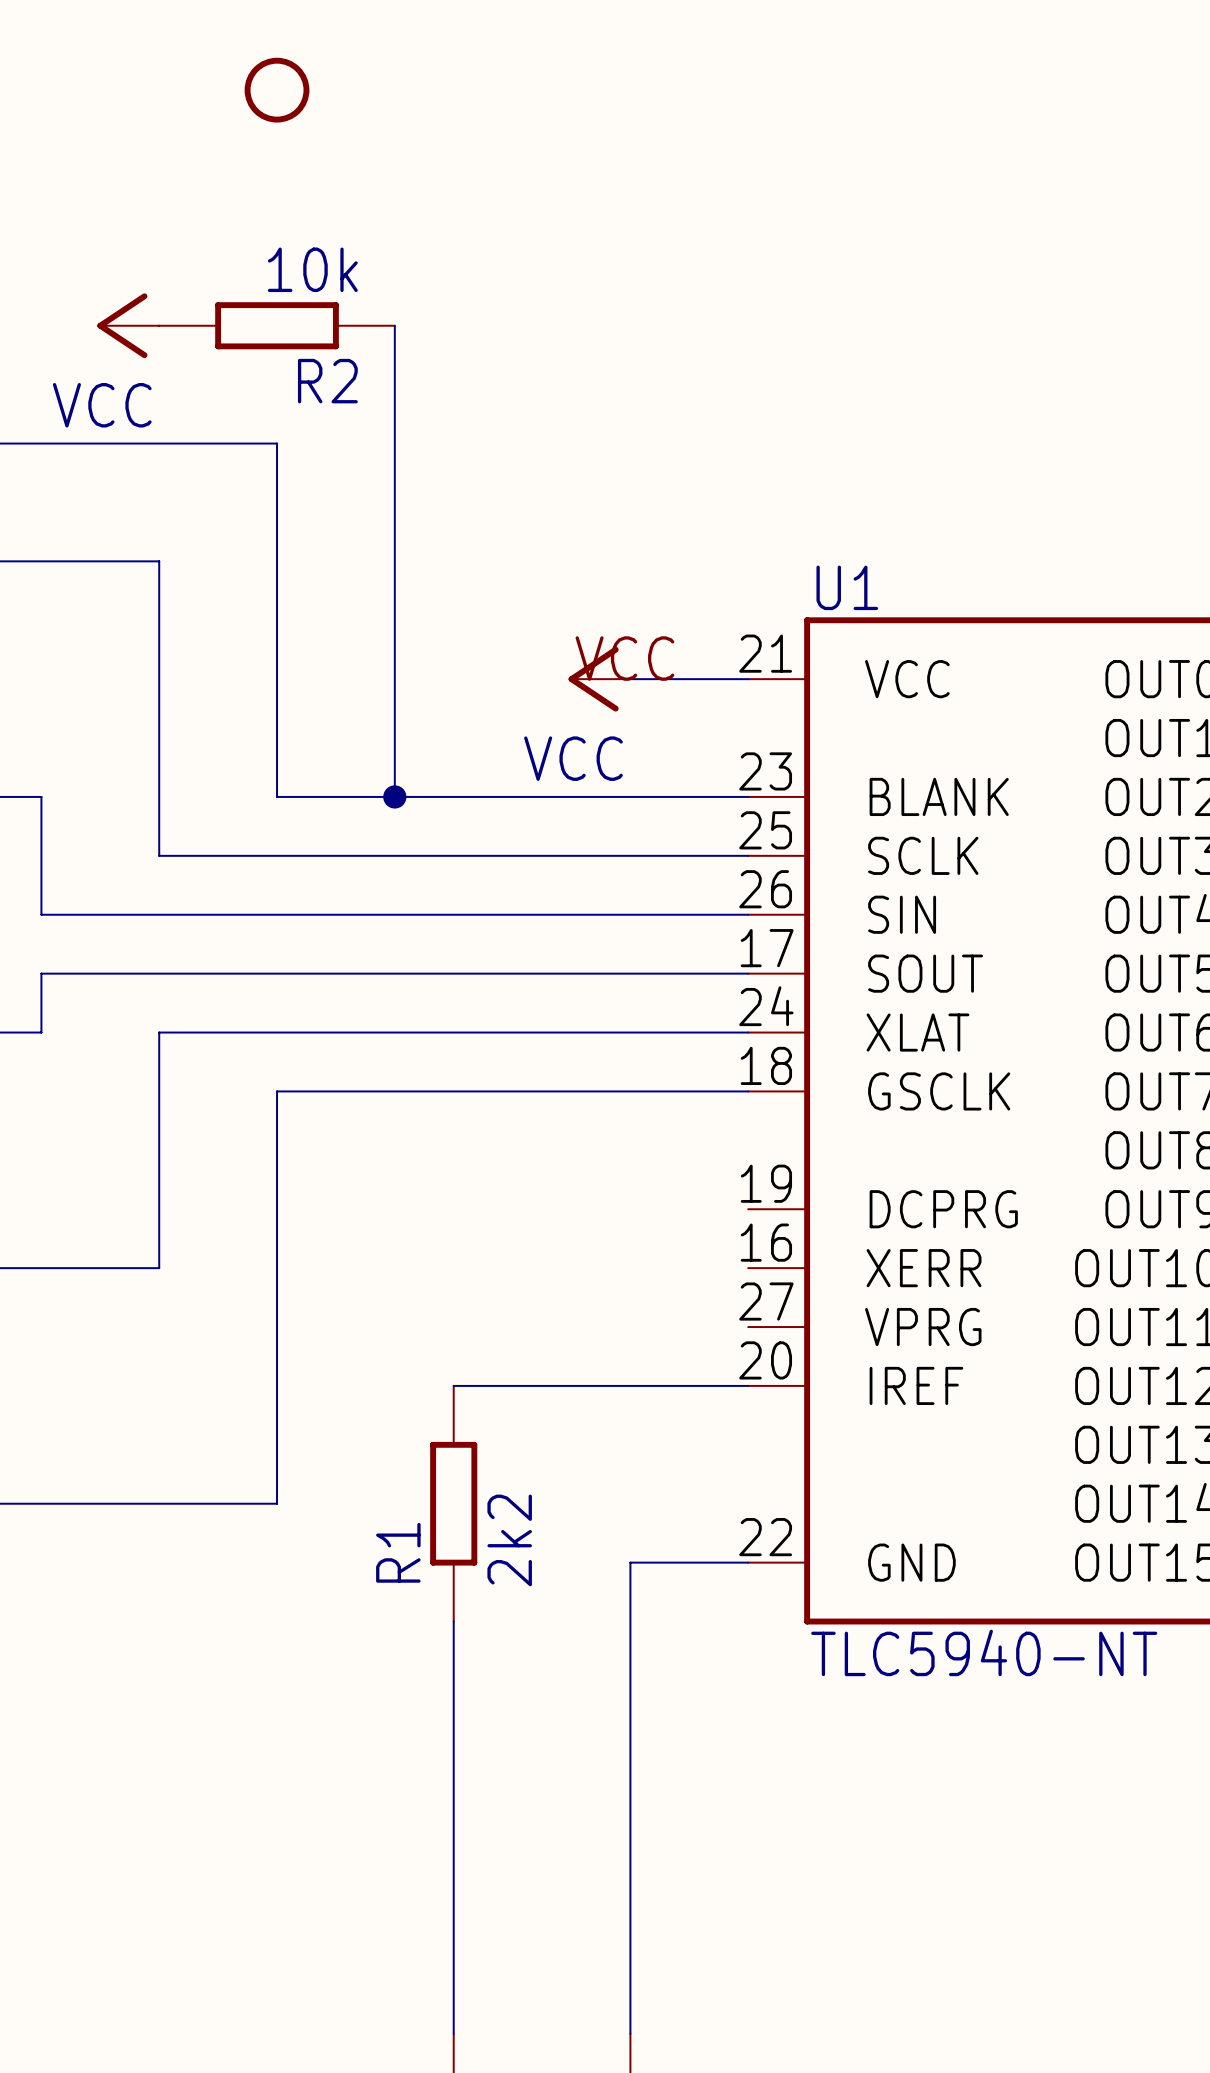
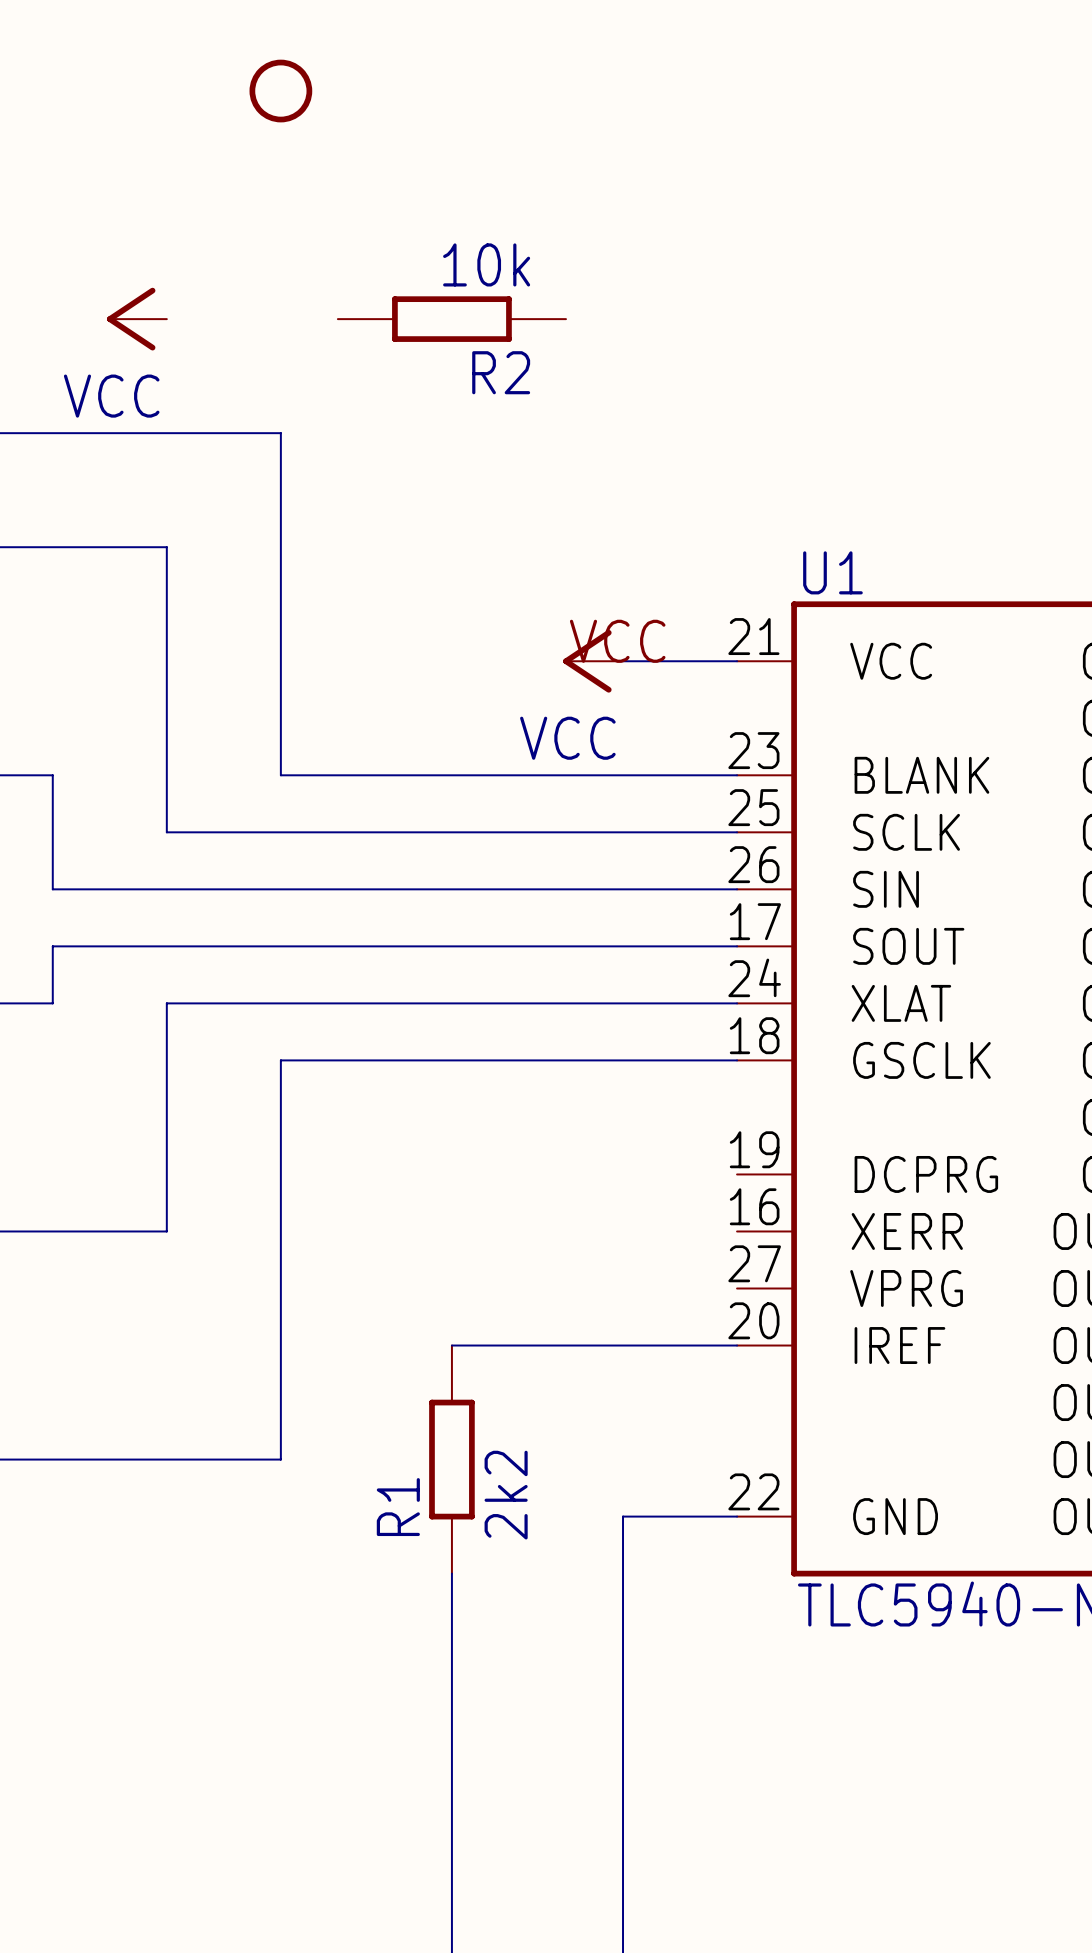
R2 position: (277, 325) -> (451, 319)
wire: (394, 325) (394, 796) -> none
junction: (394, 796) -> none

